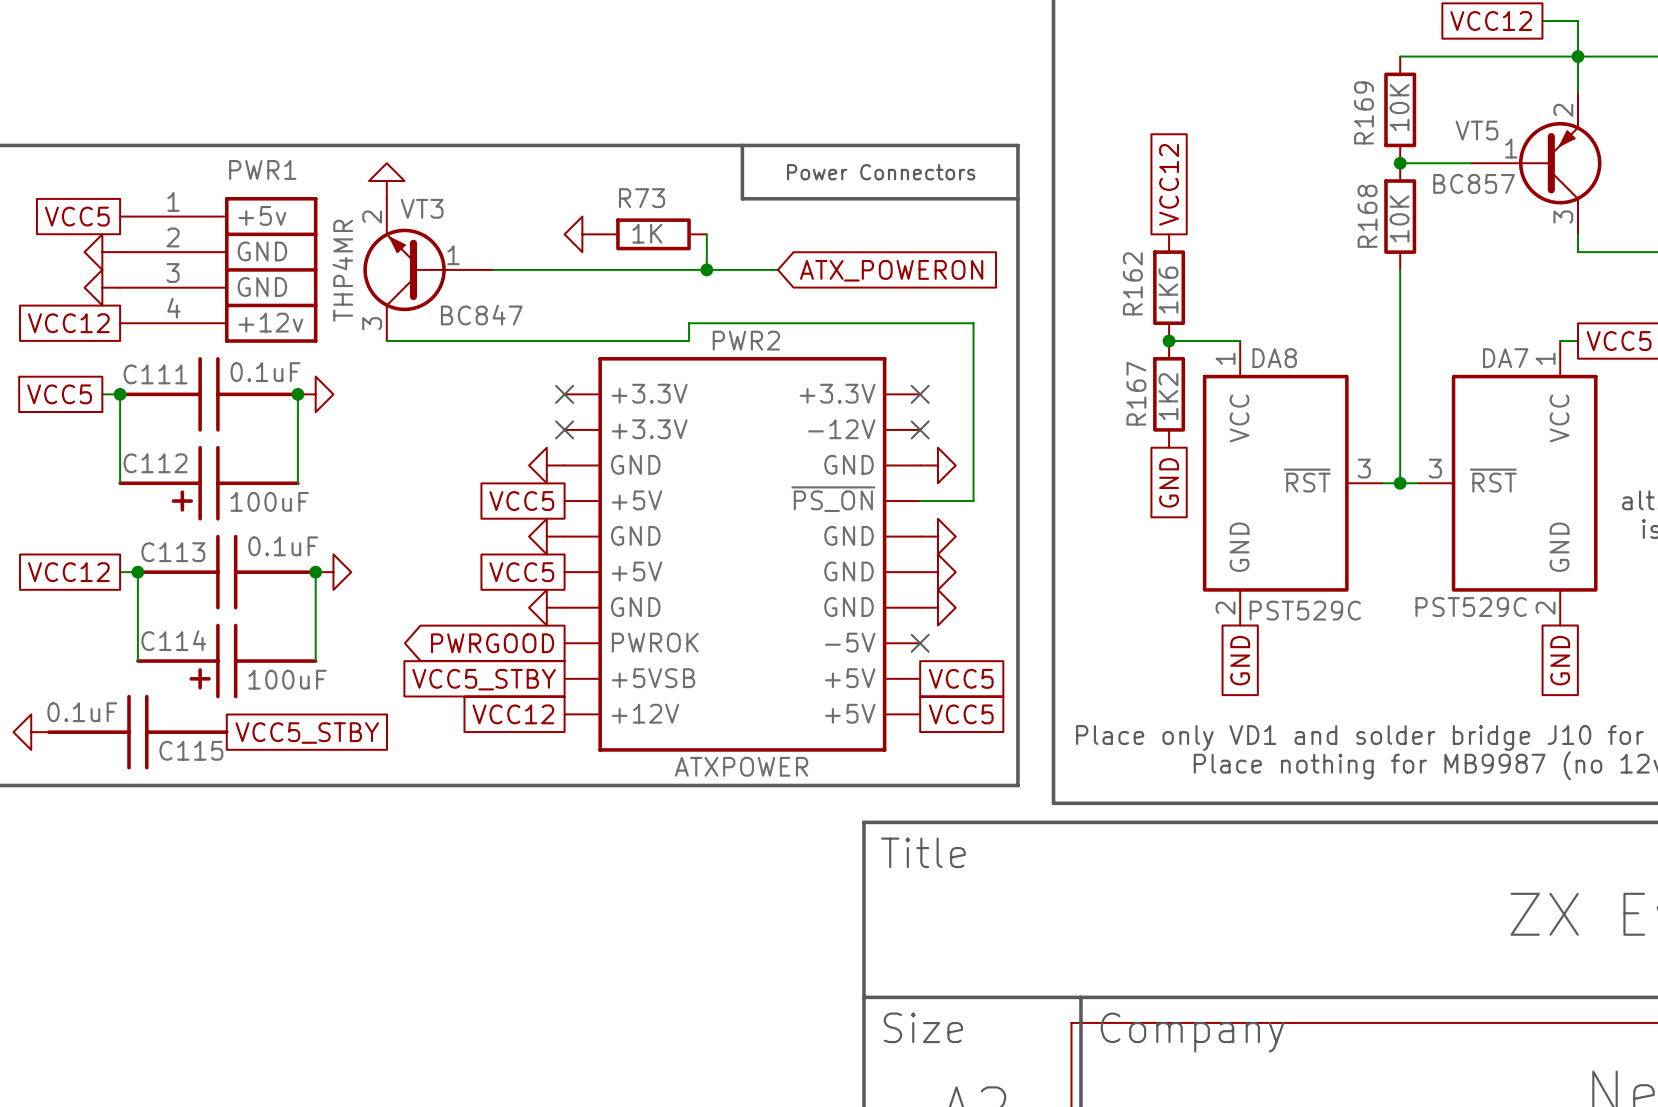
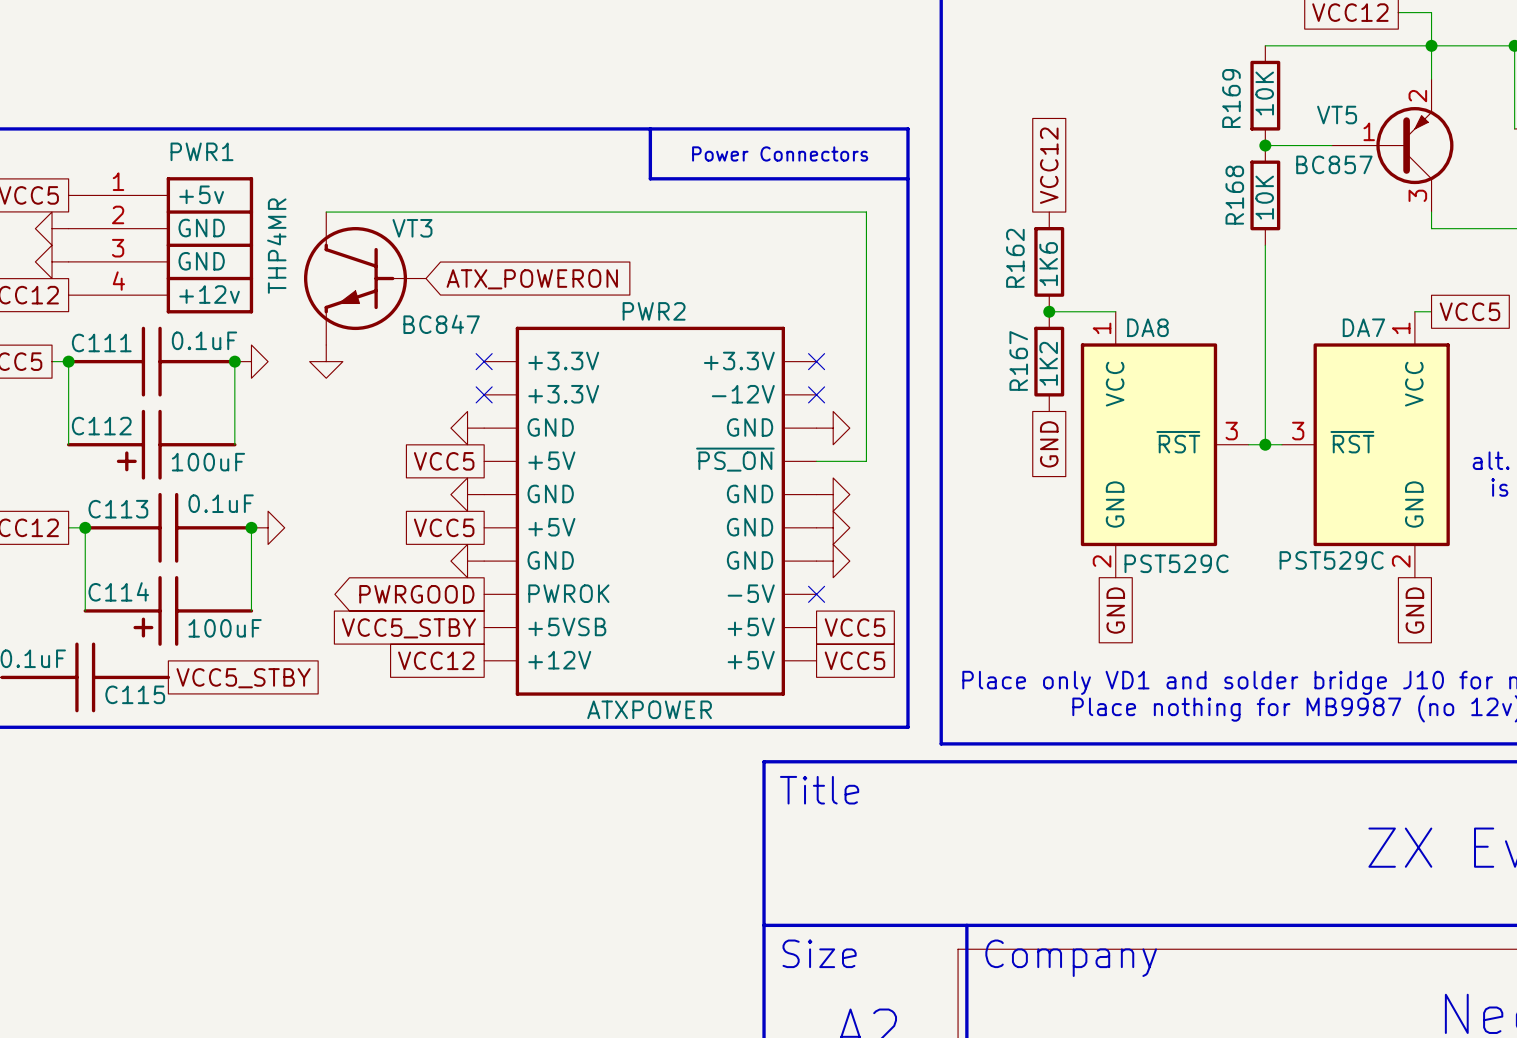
power symbol: (386, 181) -> none
VT3 symbol: [363, 198, 494, 342] -> [303, 212, 426, 346]
VT3 name position: VT3 (422, 208) -> VT3 (412, 228)
power symbol: (582, 234) -> none
R73: 1K (653, 234) -> none
wire: (706, 234) (706, 269) -> none
wire: (493, 269) (777, 269) -> none
junction: (706, 269) -> none
global label position: ATX_POWERON (891, 270) -> ATX_POWERON (532, 279)
VT3 value position: BC847 (481, 315) -> BC847 (441, 324)
wire: (973, 323) (689, 323) (689, 341) (386, 341) -> (866, 295) (866, 212) (326, 212)
power symbol: none -> (326, 361)

